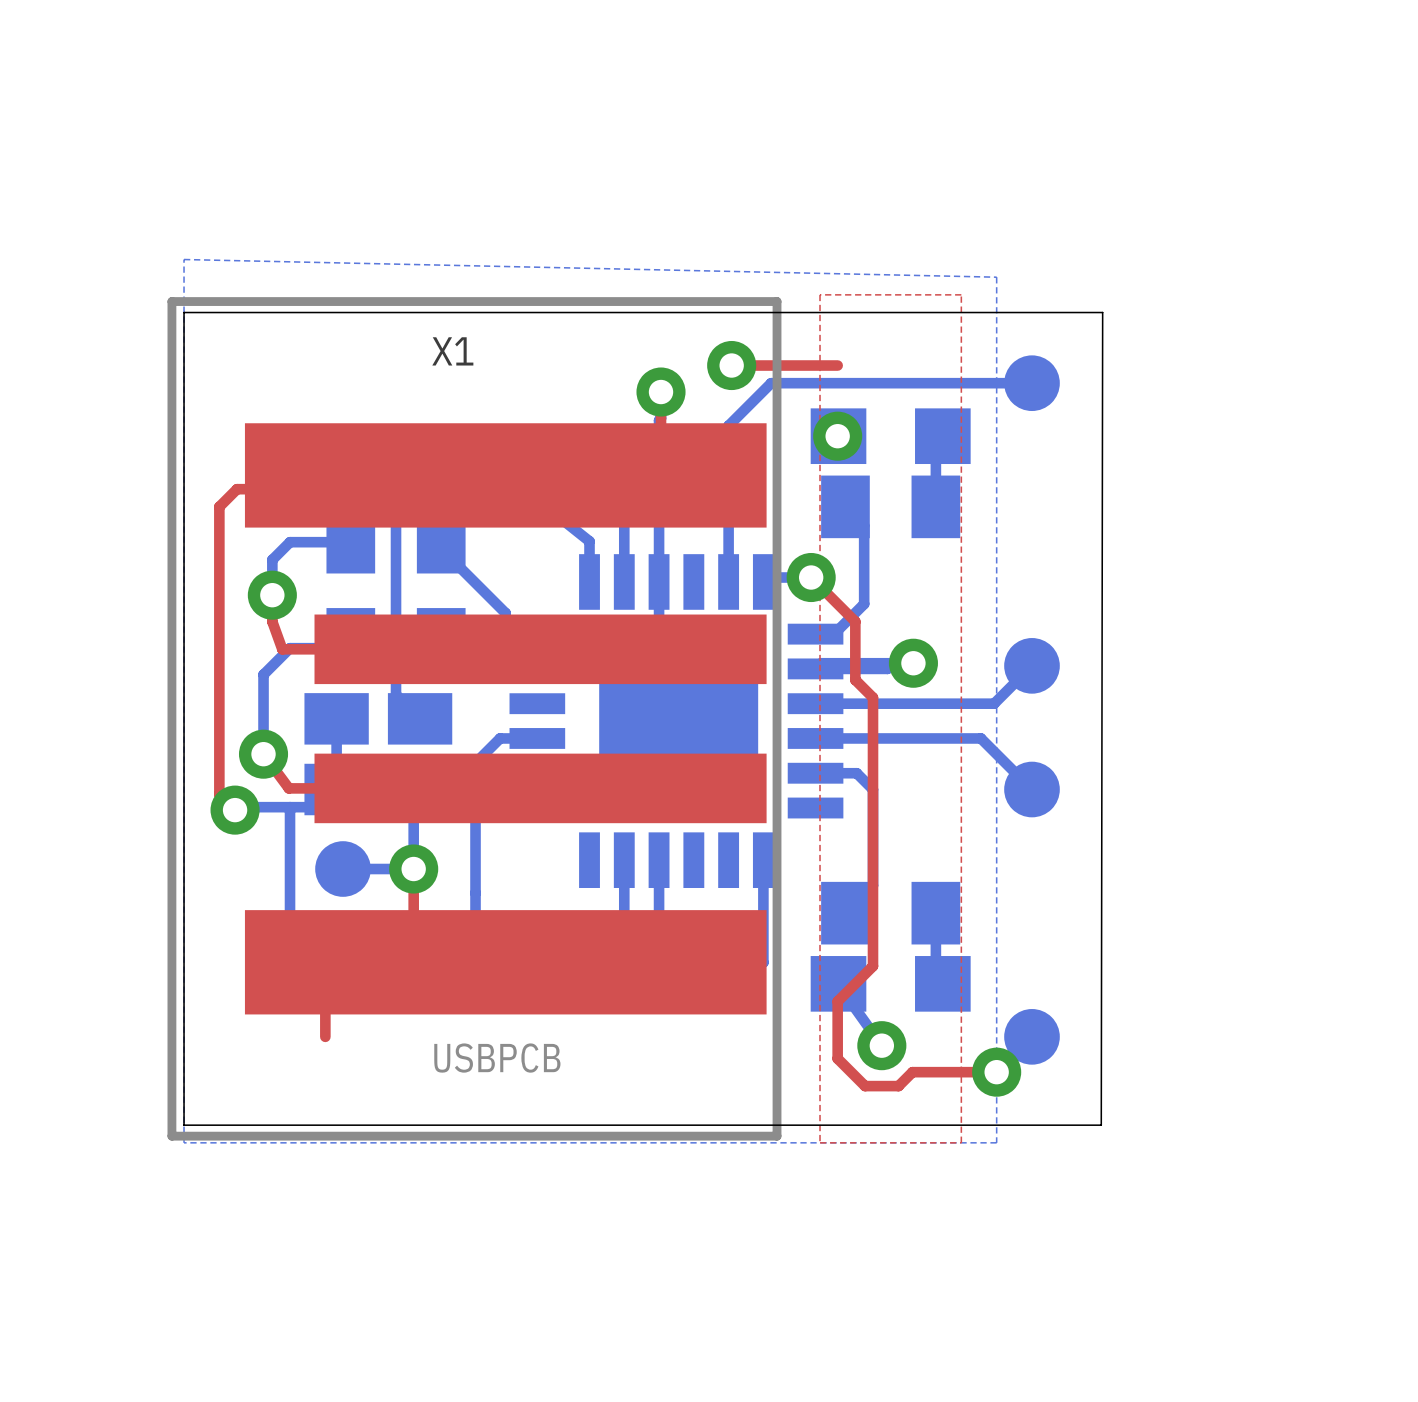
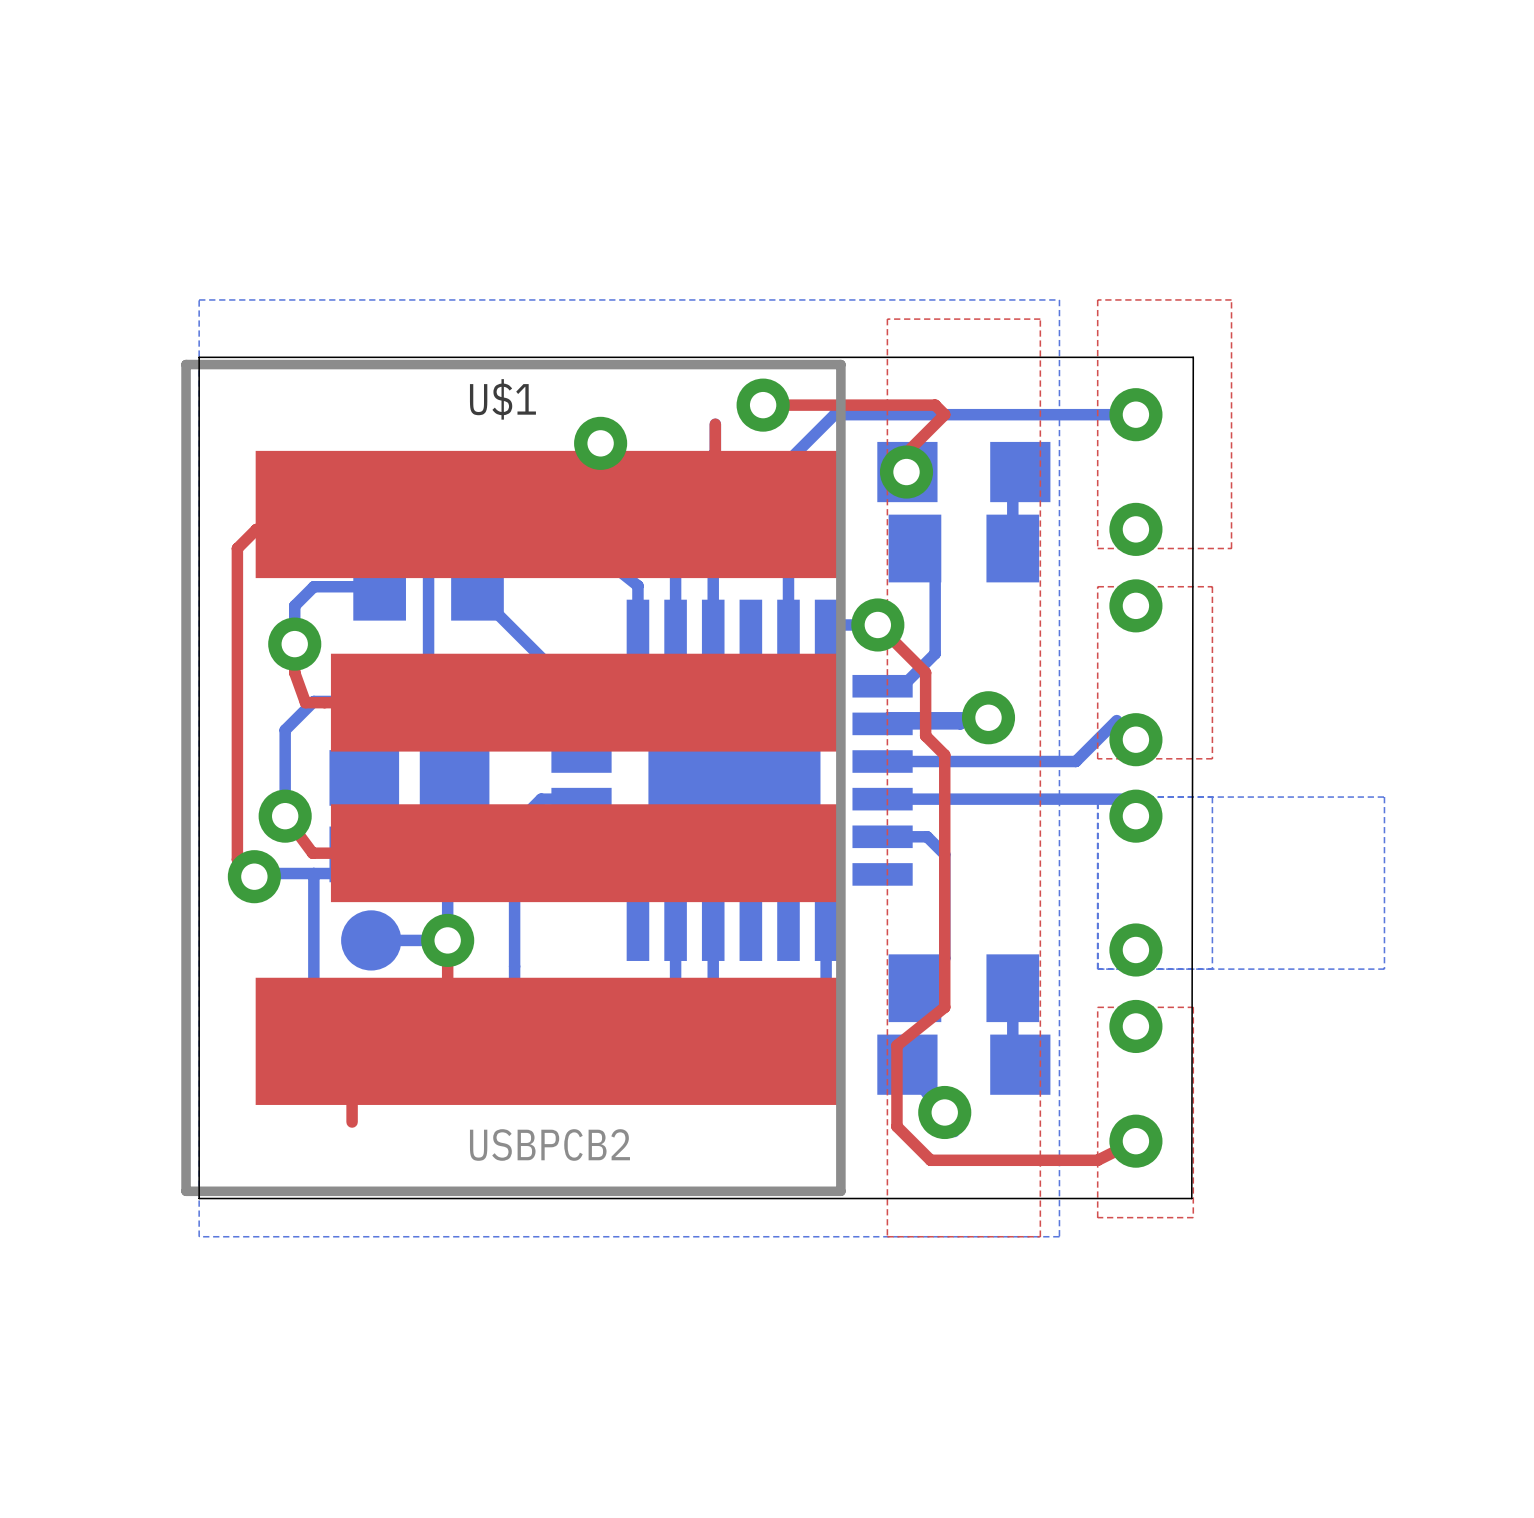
bottom zone outline: (184, 277) (184, 259) (996, 277) (996, 1142) (979, 1142) -> (199, 299) (1059, 299) (1059, 1236)
top zone outline: none -> (1097, 299) (1097, 548) (1231, 548) (1231, 299) (1097, 299)
board edge: (184, 330) (184, 312) (1102, 312) (1102, 330) -> (199, 357) (1193, 357)
top track: (731, 365) (837, 365) -> none
via: (731, 365) -> none
top track: none -> (763, 405) (935, 405) (944, 414) (906, 452) (906, 472)
via: none -> (763, 405)
part: (1031, 383) -> none
via: none -> (1135, 414)
via: (661, 392) -> none
via: none -> (600, 443)
via: none -> (1135, 529)
top zone outline: none -> (1097, 586) (1212, 586) (1212, 758) (1097, 758) (1097, 586)
via: none -> (1135, 605)
part: (1031, 665) -> none
via: none -> (1135, 739)
X1: USBPCB (474, 718) -> none
U$1: none -> USBPCB2 (513, 777)
bottom zone outline: none -> (1097, 797) (1384, 797) (1384, 969) (1097, 969) (1097, 797)
bottom zone outline: none -> (1212, 797) (1212, 969)
bottom track: (980, 738) (1031, 789) -> (1061, 799) (1138, 799)
via: none -> (1135, 816)
part: (1031, 789) -> none
via: none -> (1135, 949)
top track: (873, 930) (873, 966) (837, 1001) (837, 1058) (865, 1086) (898, 1086) (912, 1072) -> (944, 1007) (896, 1045) (896, 1126) (930, 1160) (987, 1160)
top zone outline: none -> (1097, 1007) (1097, 1217) (1193, 1217) (1193, 1007) (1097, 1007)
via: none -> (1135, 1026)
part: (1031, 1036) -> none
via position: (881, 1045) -> (944, 1112)
top track: none -> (1135, 1141) (1097, 1160) (1078, 1160)
via position: (996, 1072) -> (1135, 1141)
board edge: (184, 1107) (184, 1125) (1101, 1125) (1101, 1107) -> (199, 1198) (1191, 1198)

